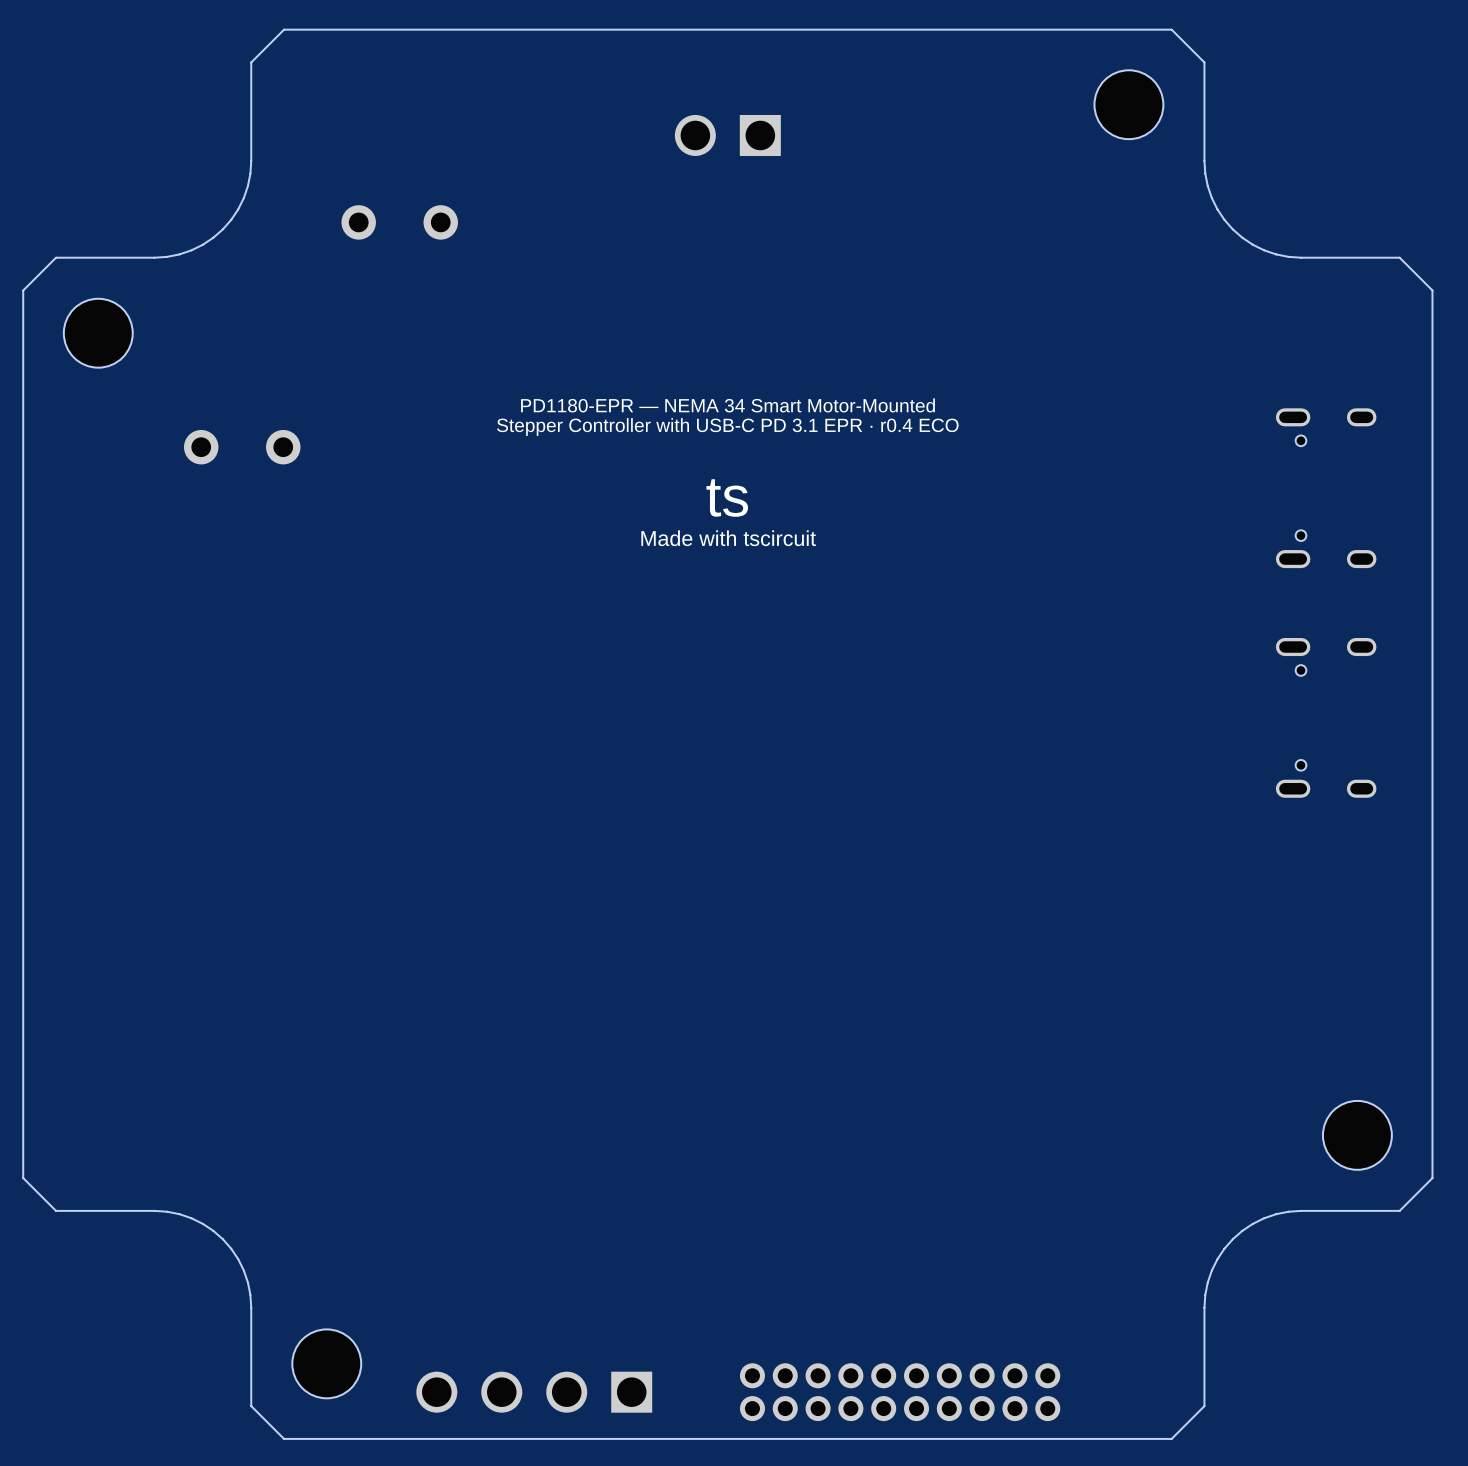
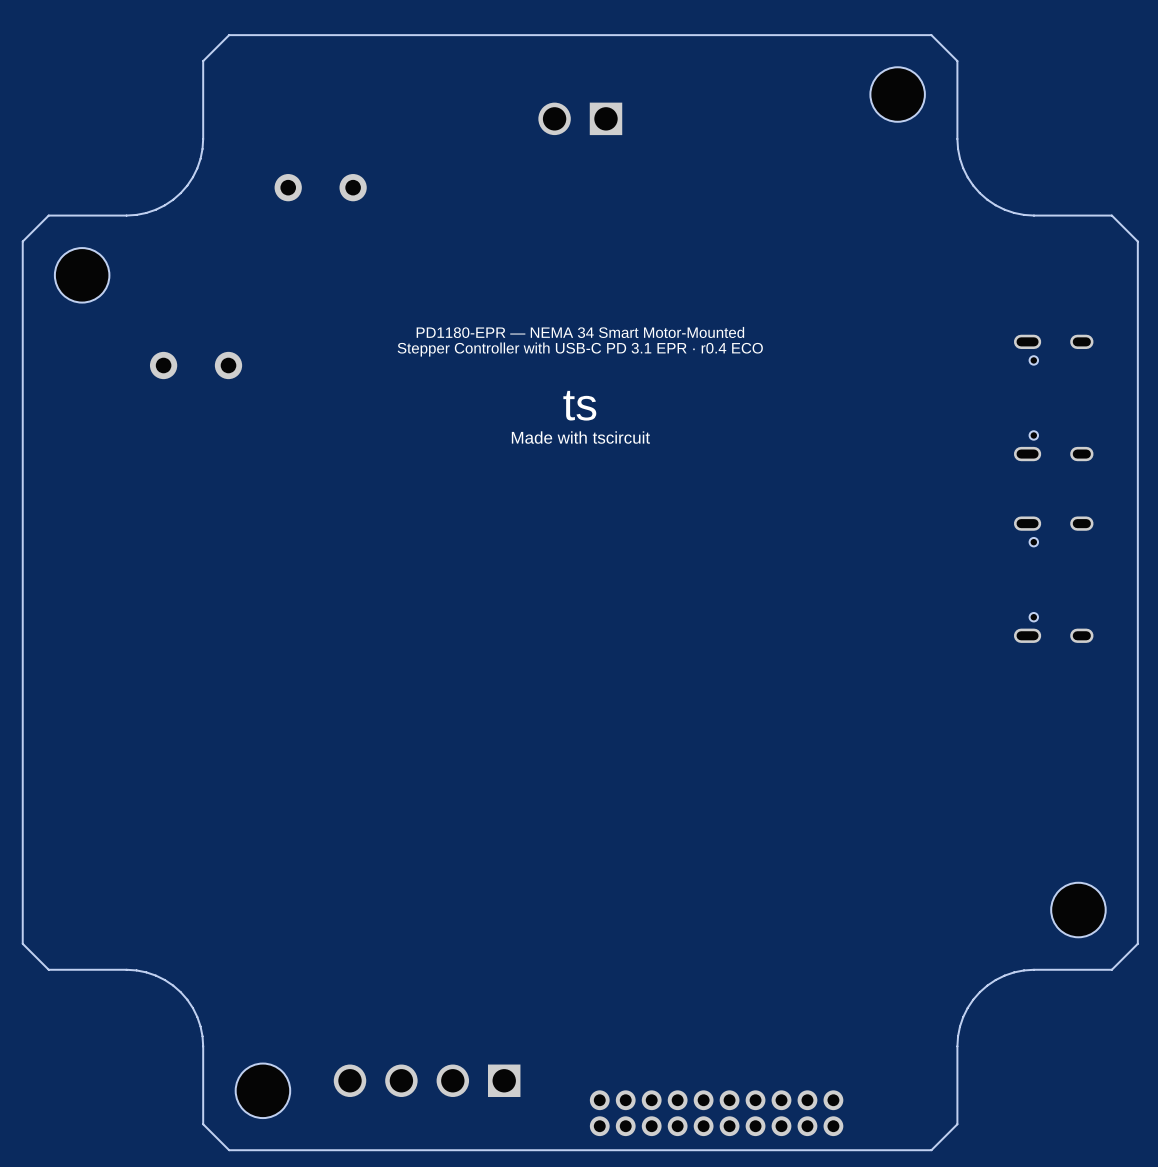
part position: (534, 1392) -> (427, 1080)

